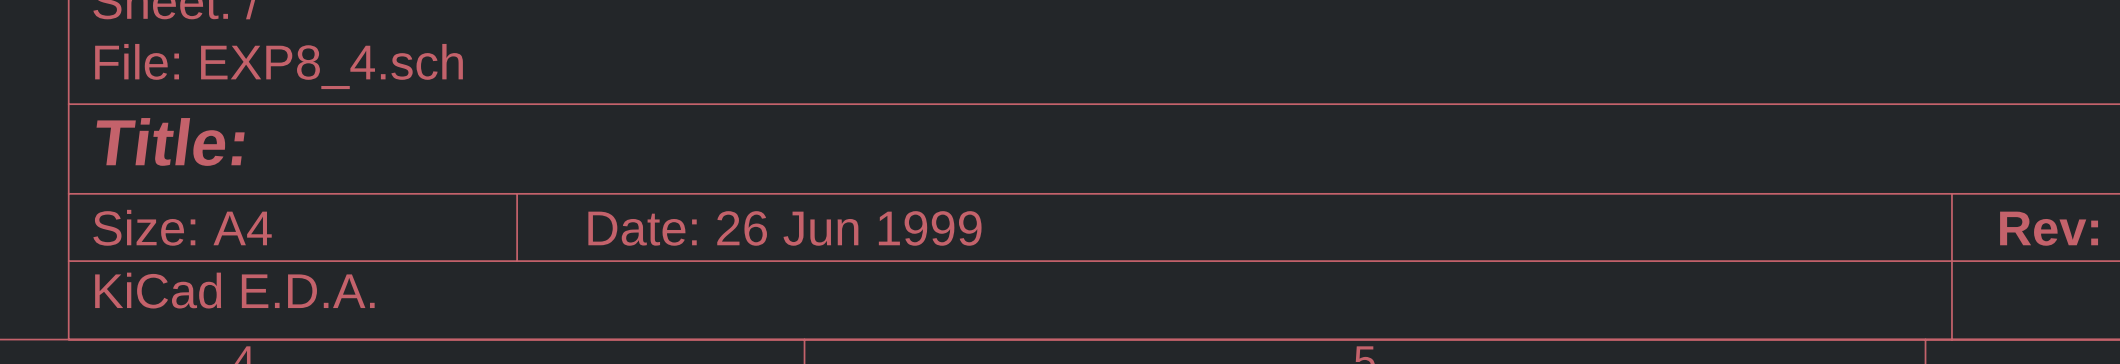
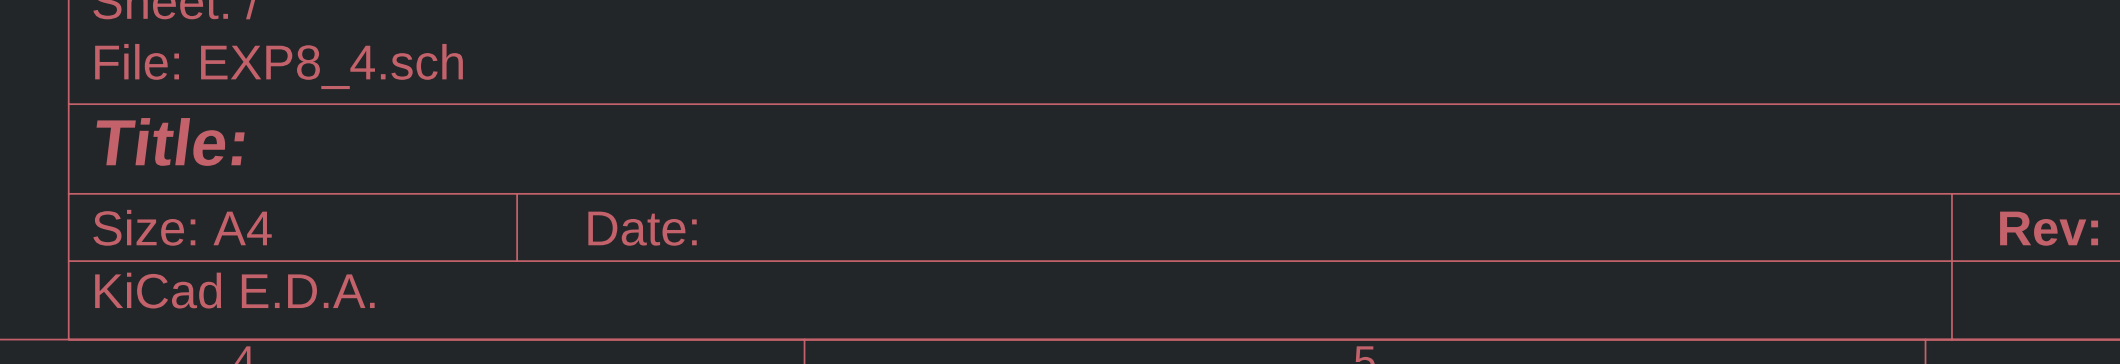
title block: Date: 26 Jun 1999 (784, 228) -> Date: (642, 228)

